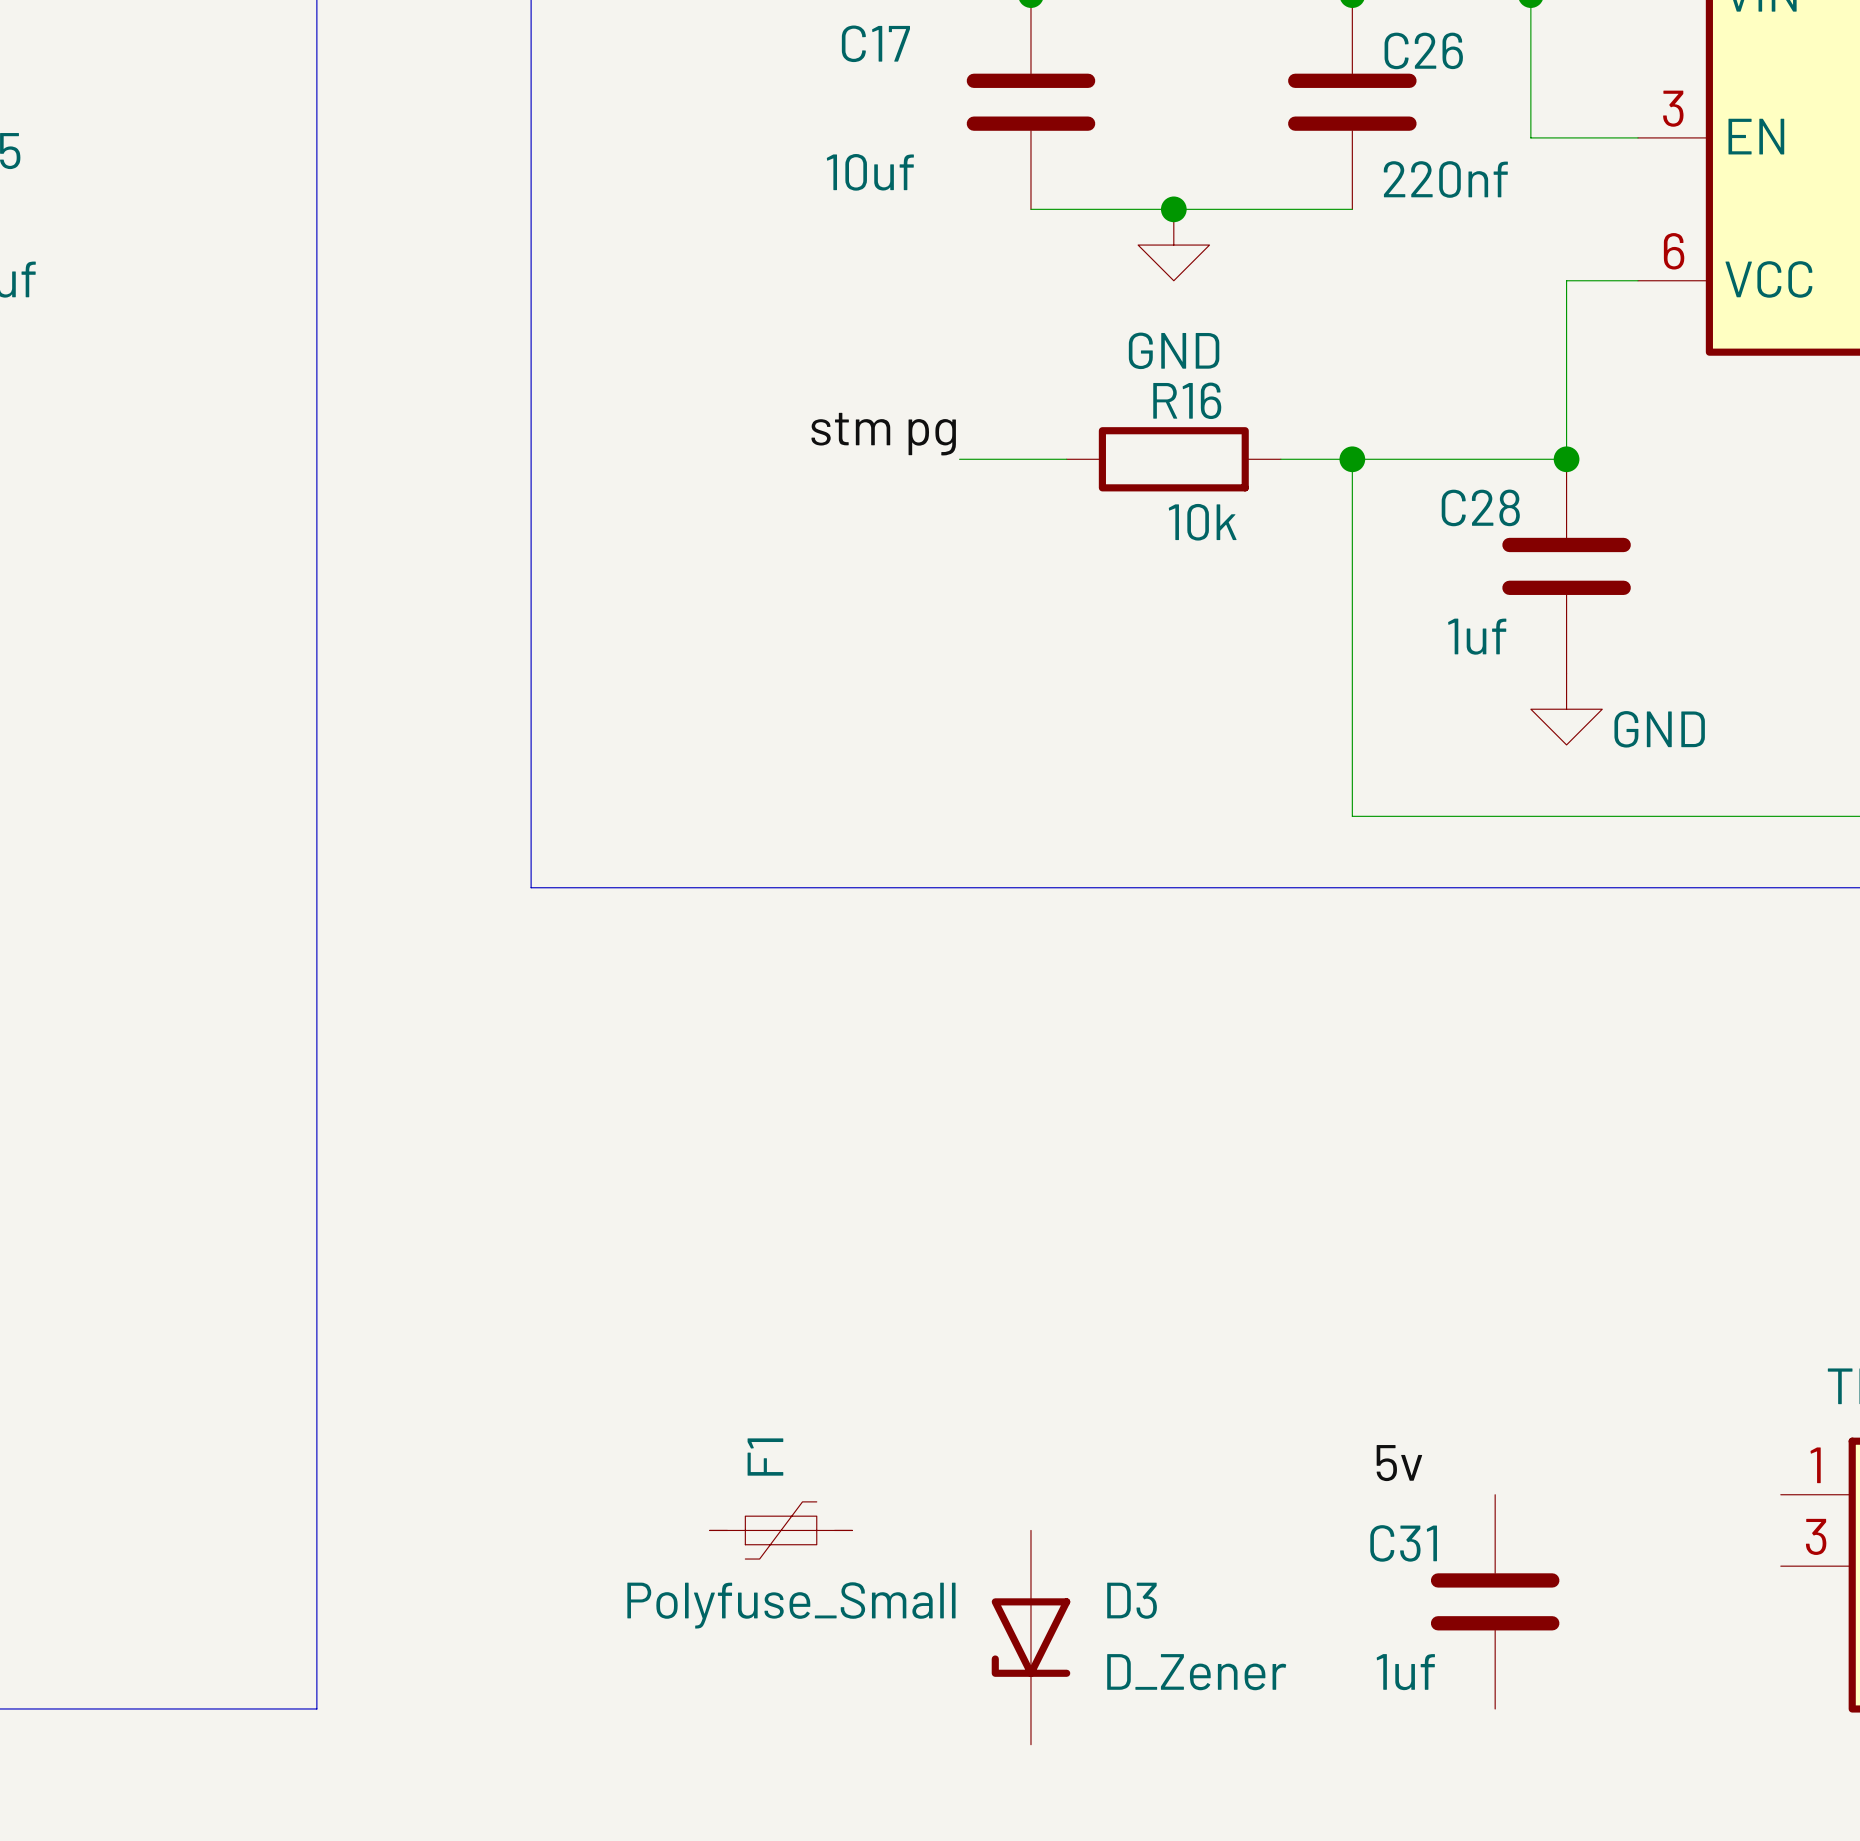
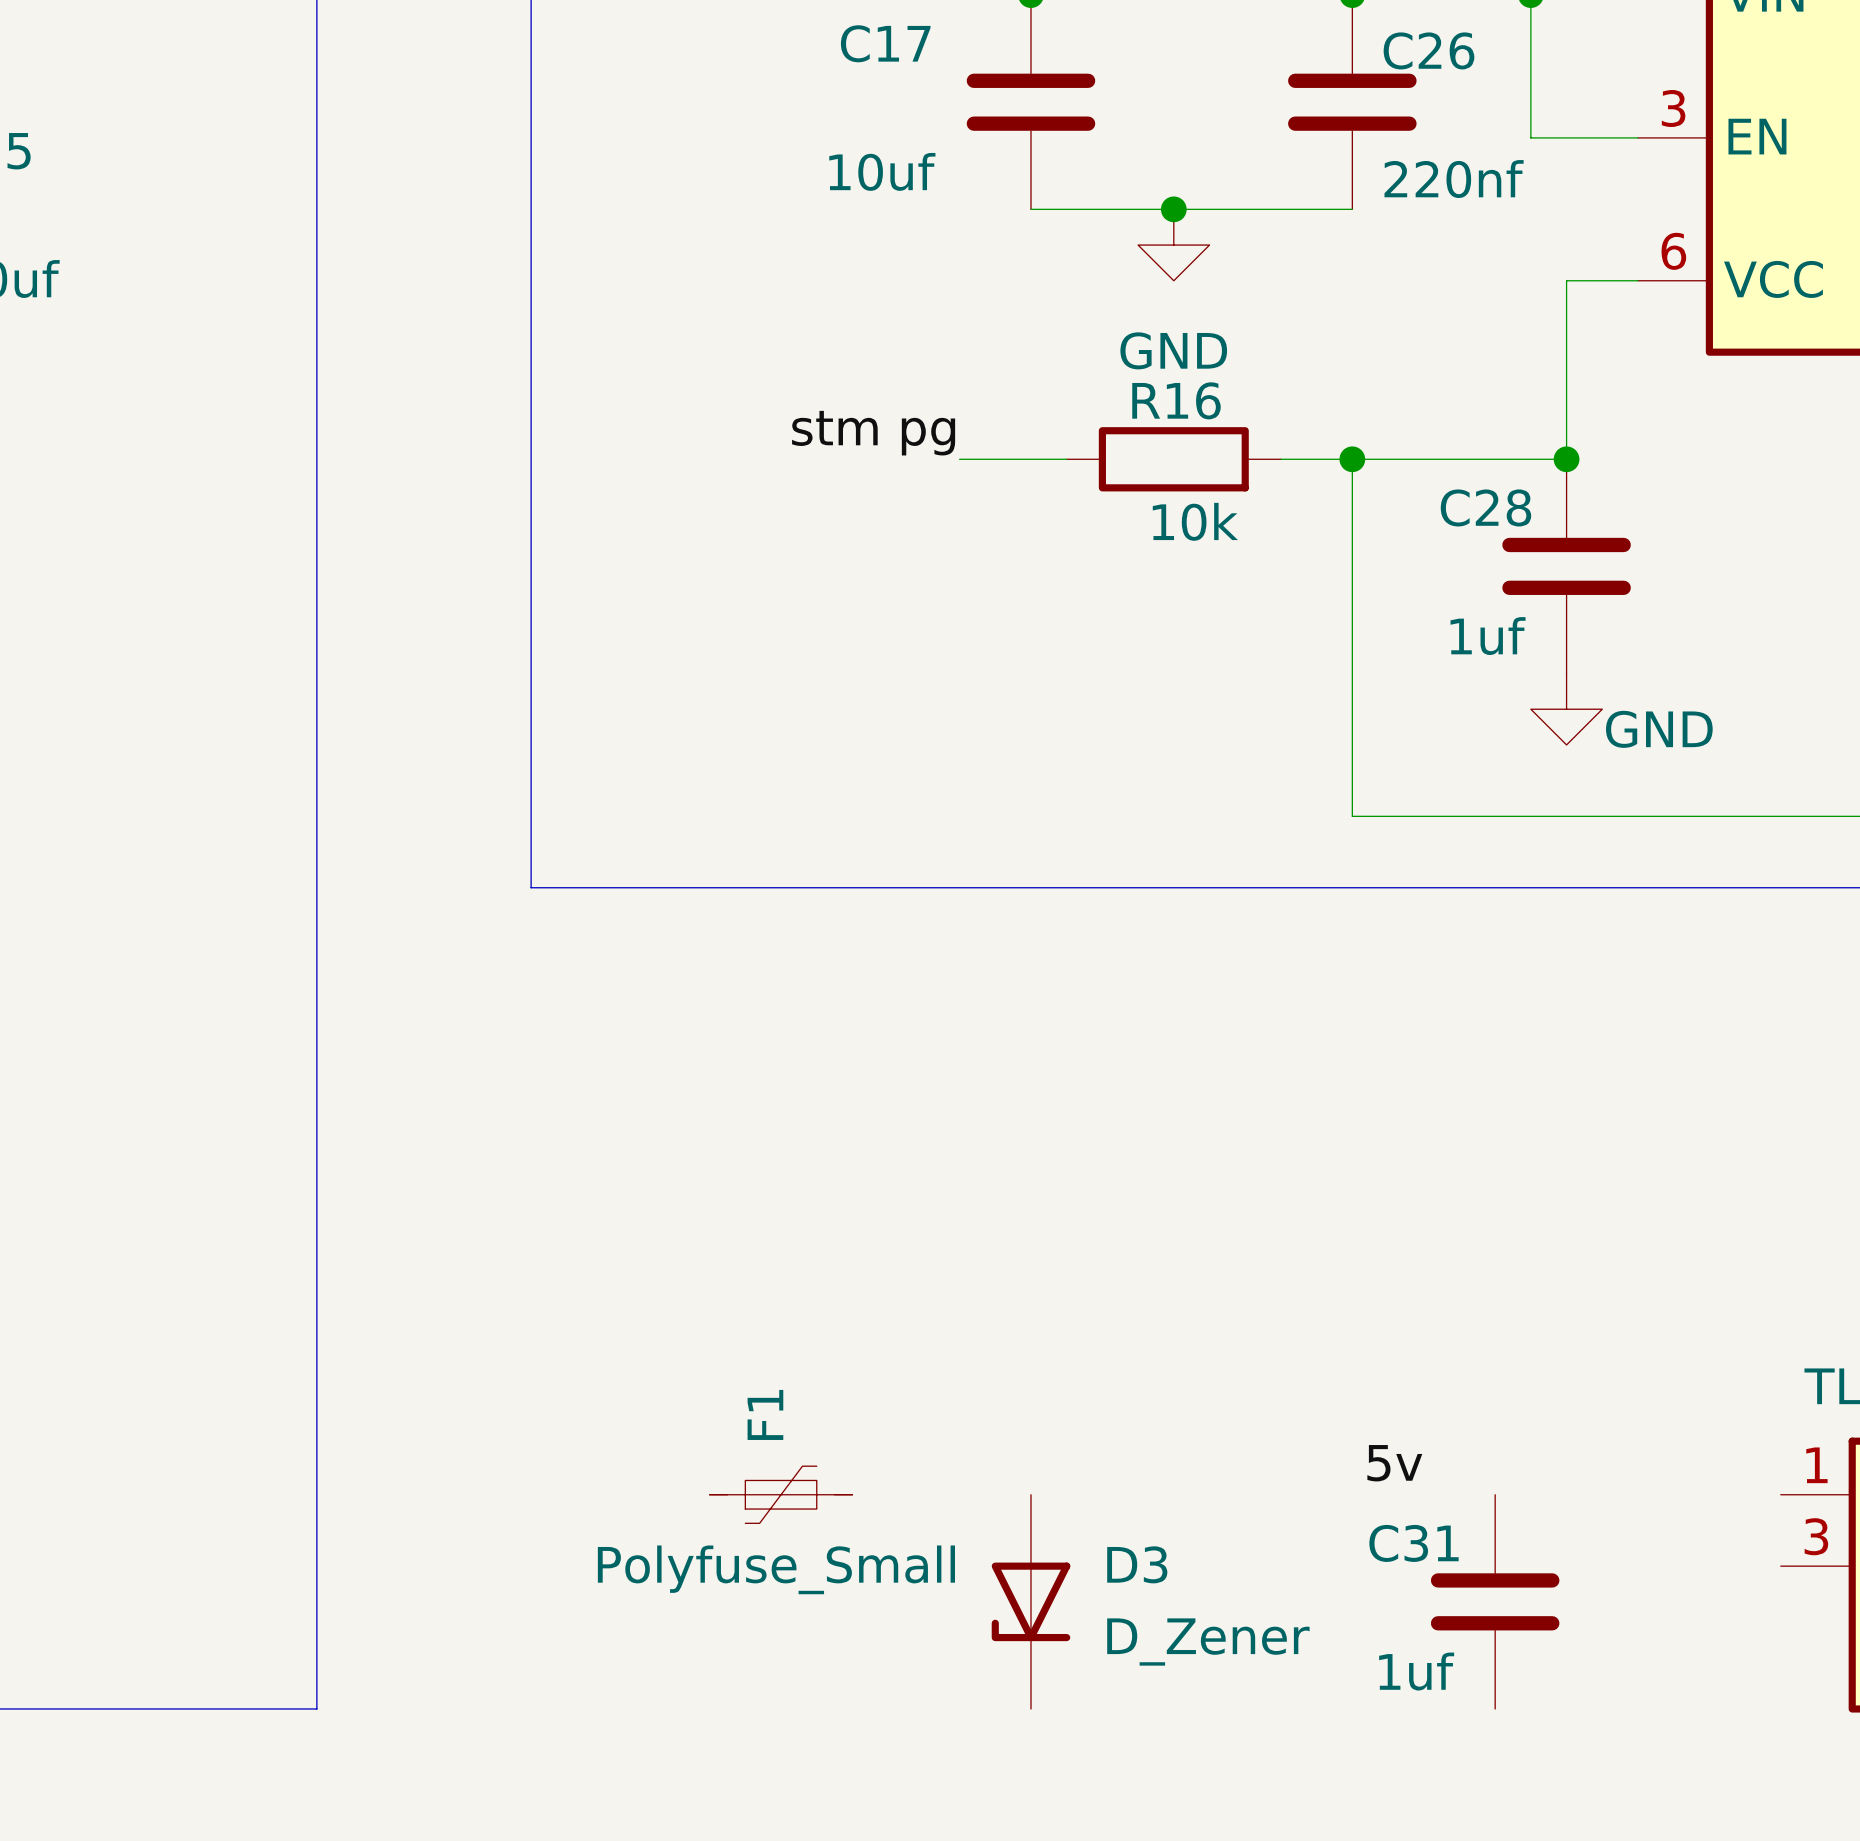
F1 position: (781, 1530) -> (781, 1494)
D3 position: (1030, 1637) -> (1030, 1601)

